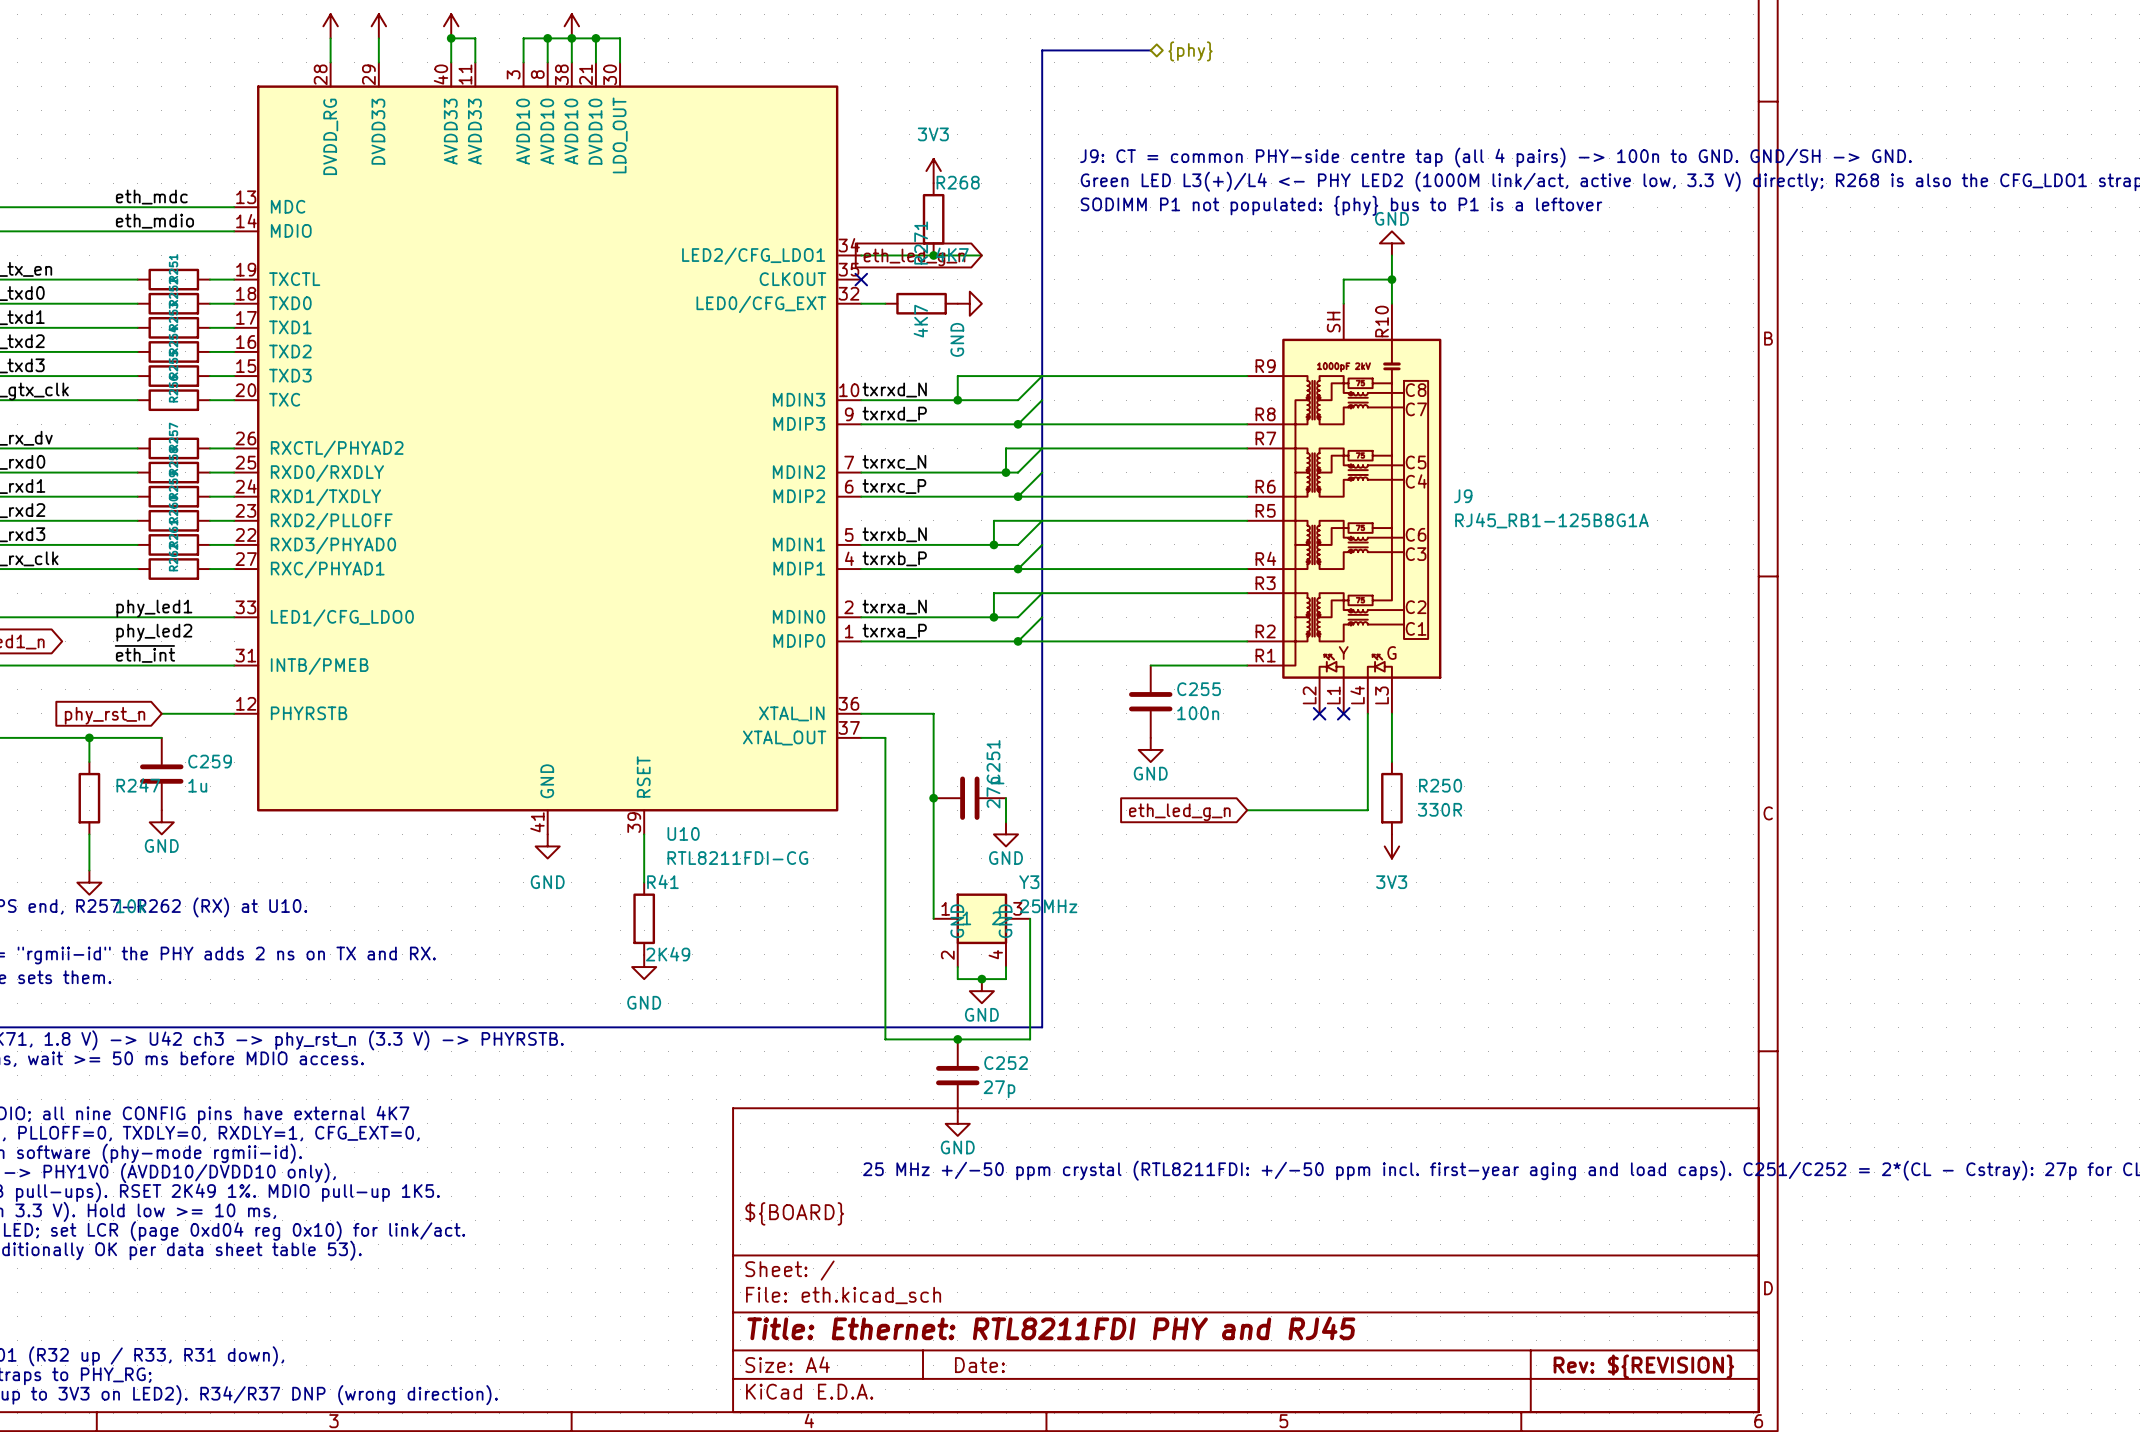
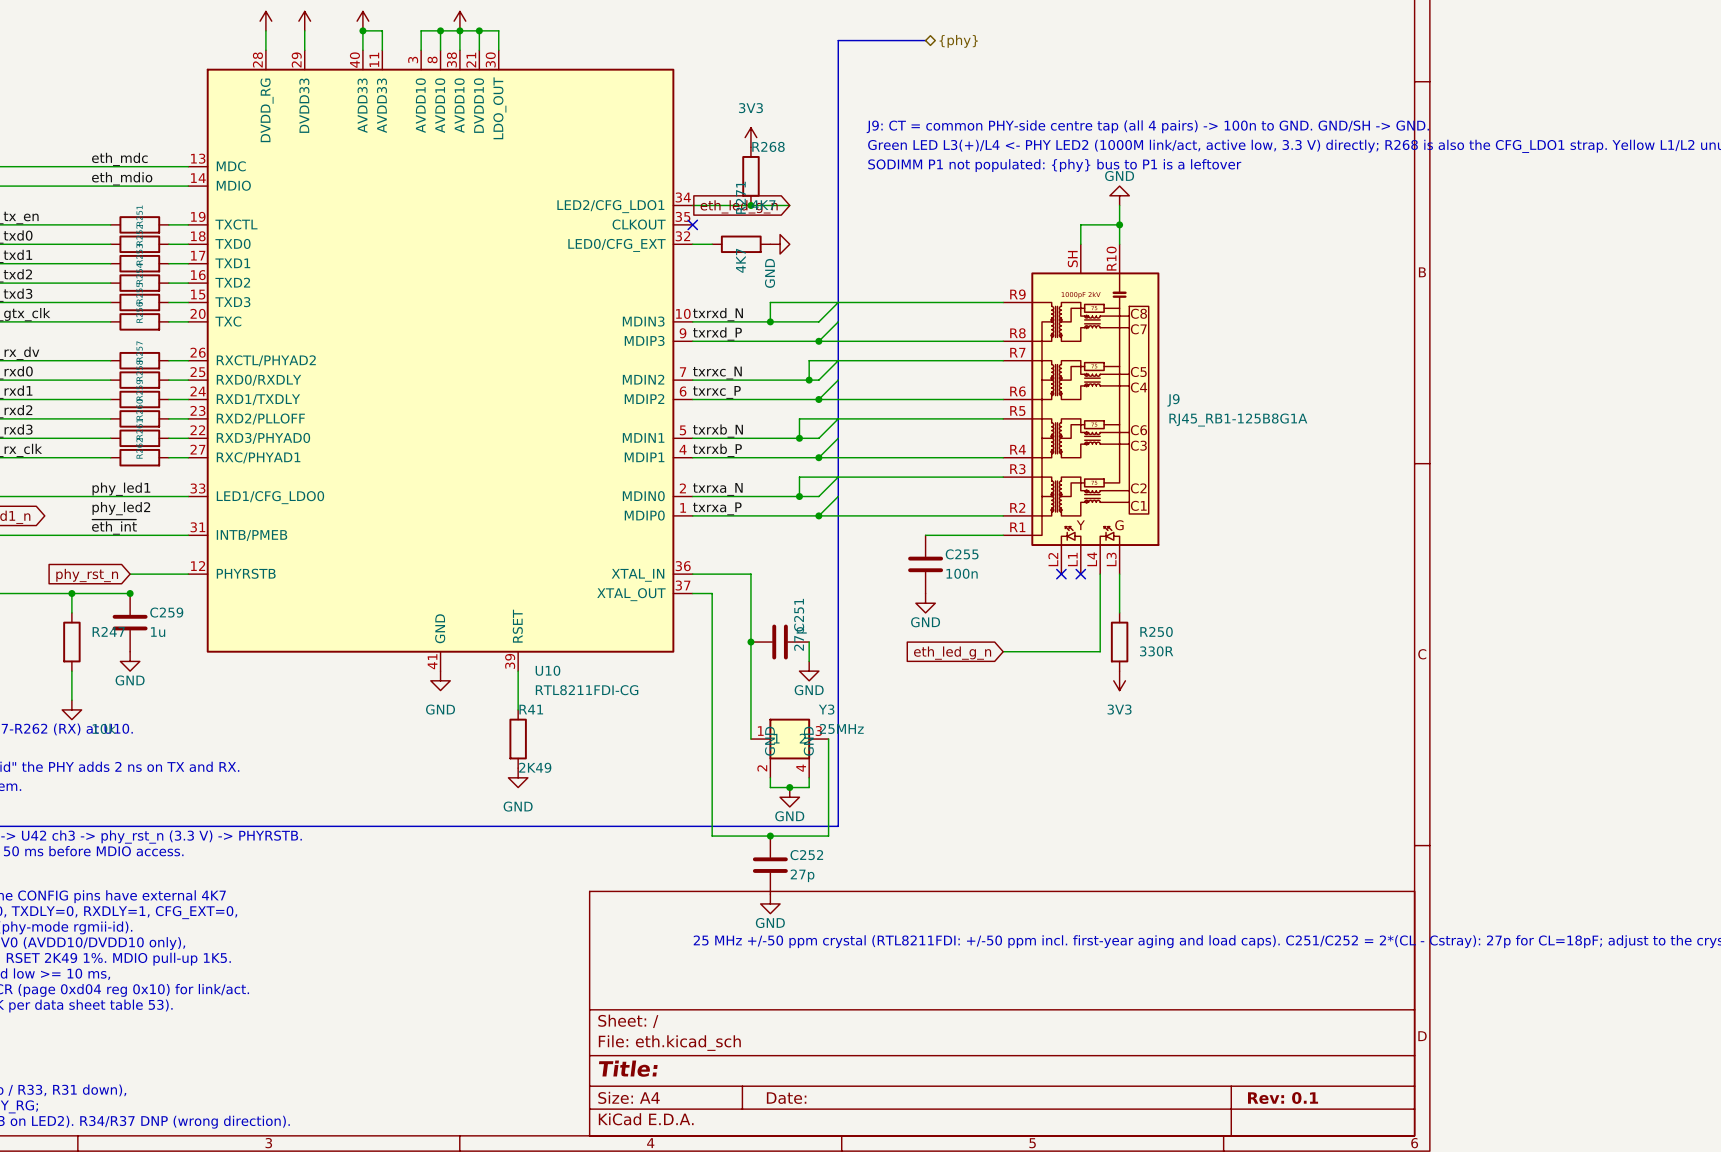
junction: none -> (130, 593)
title block: ${BOARD} (794, 1213) -> none
title block: Title: Ethernet: RTL8211FDI PHY and RJ45 (1051, 1328) -> Title: (628, 1068)
title block: Rev: ${REVISION} (1643, 1366) -> Rev: 0.1 (1283, 1098)

